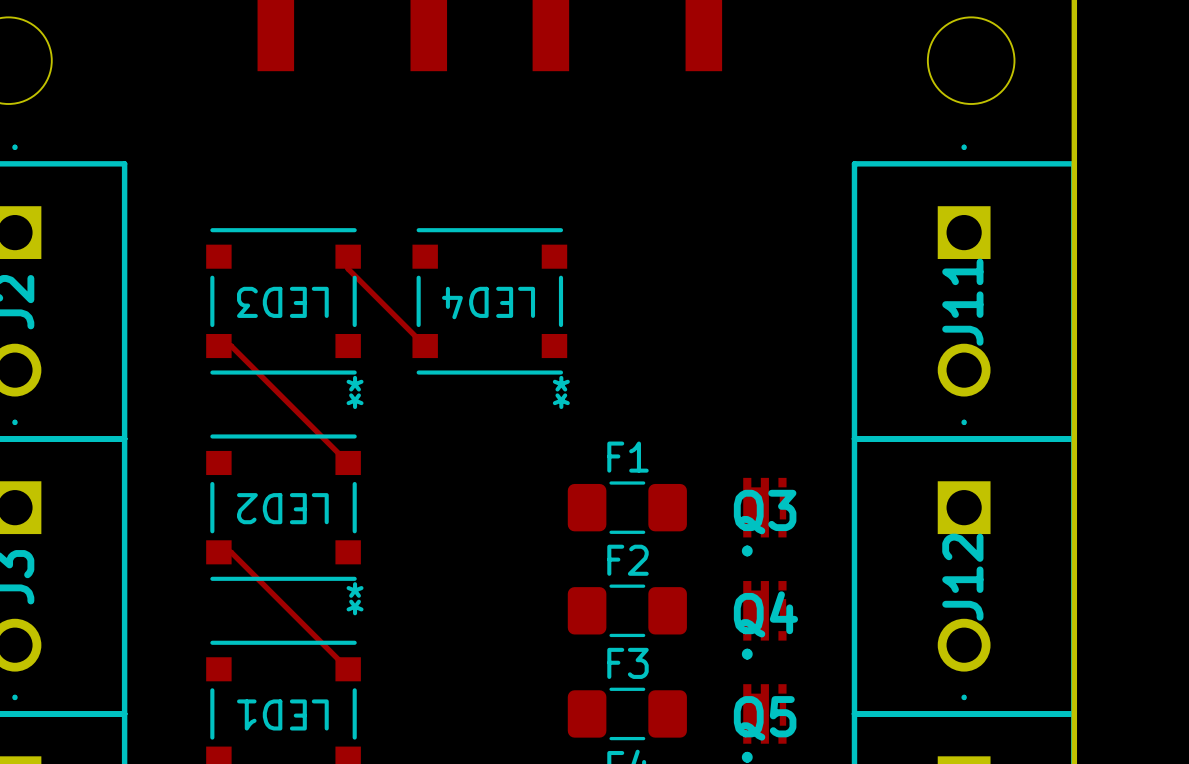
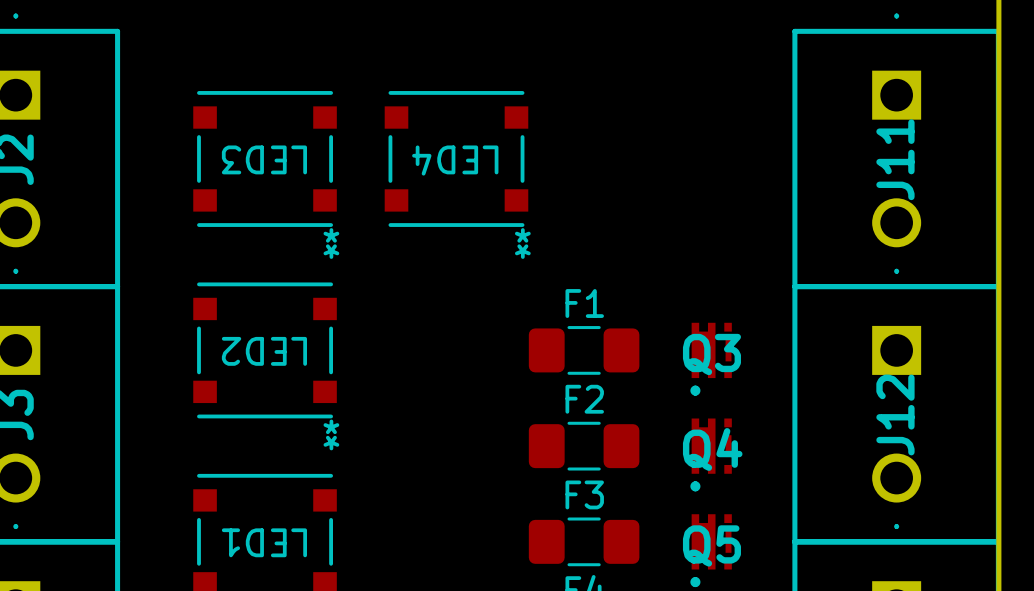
track: (348, 256) (348, 269) (425, 346) -> none
track: (218, 346) (231, 346) (348, 462) -> none
track: (218, 552) (231, 552) (348, 669) -> none

